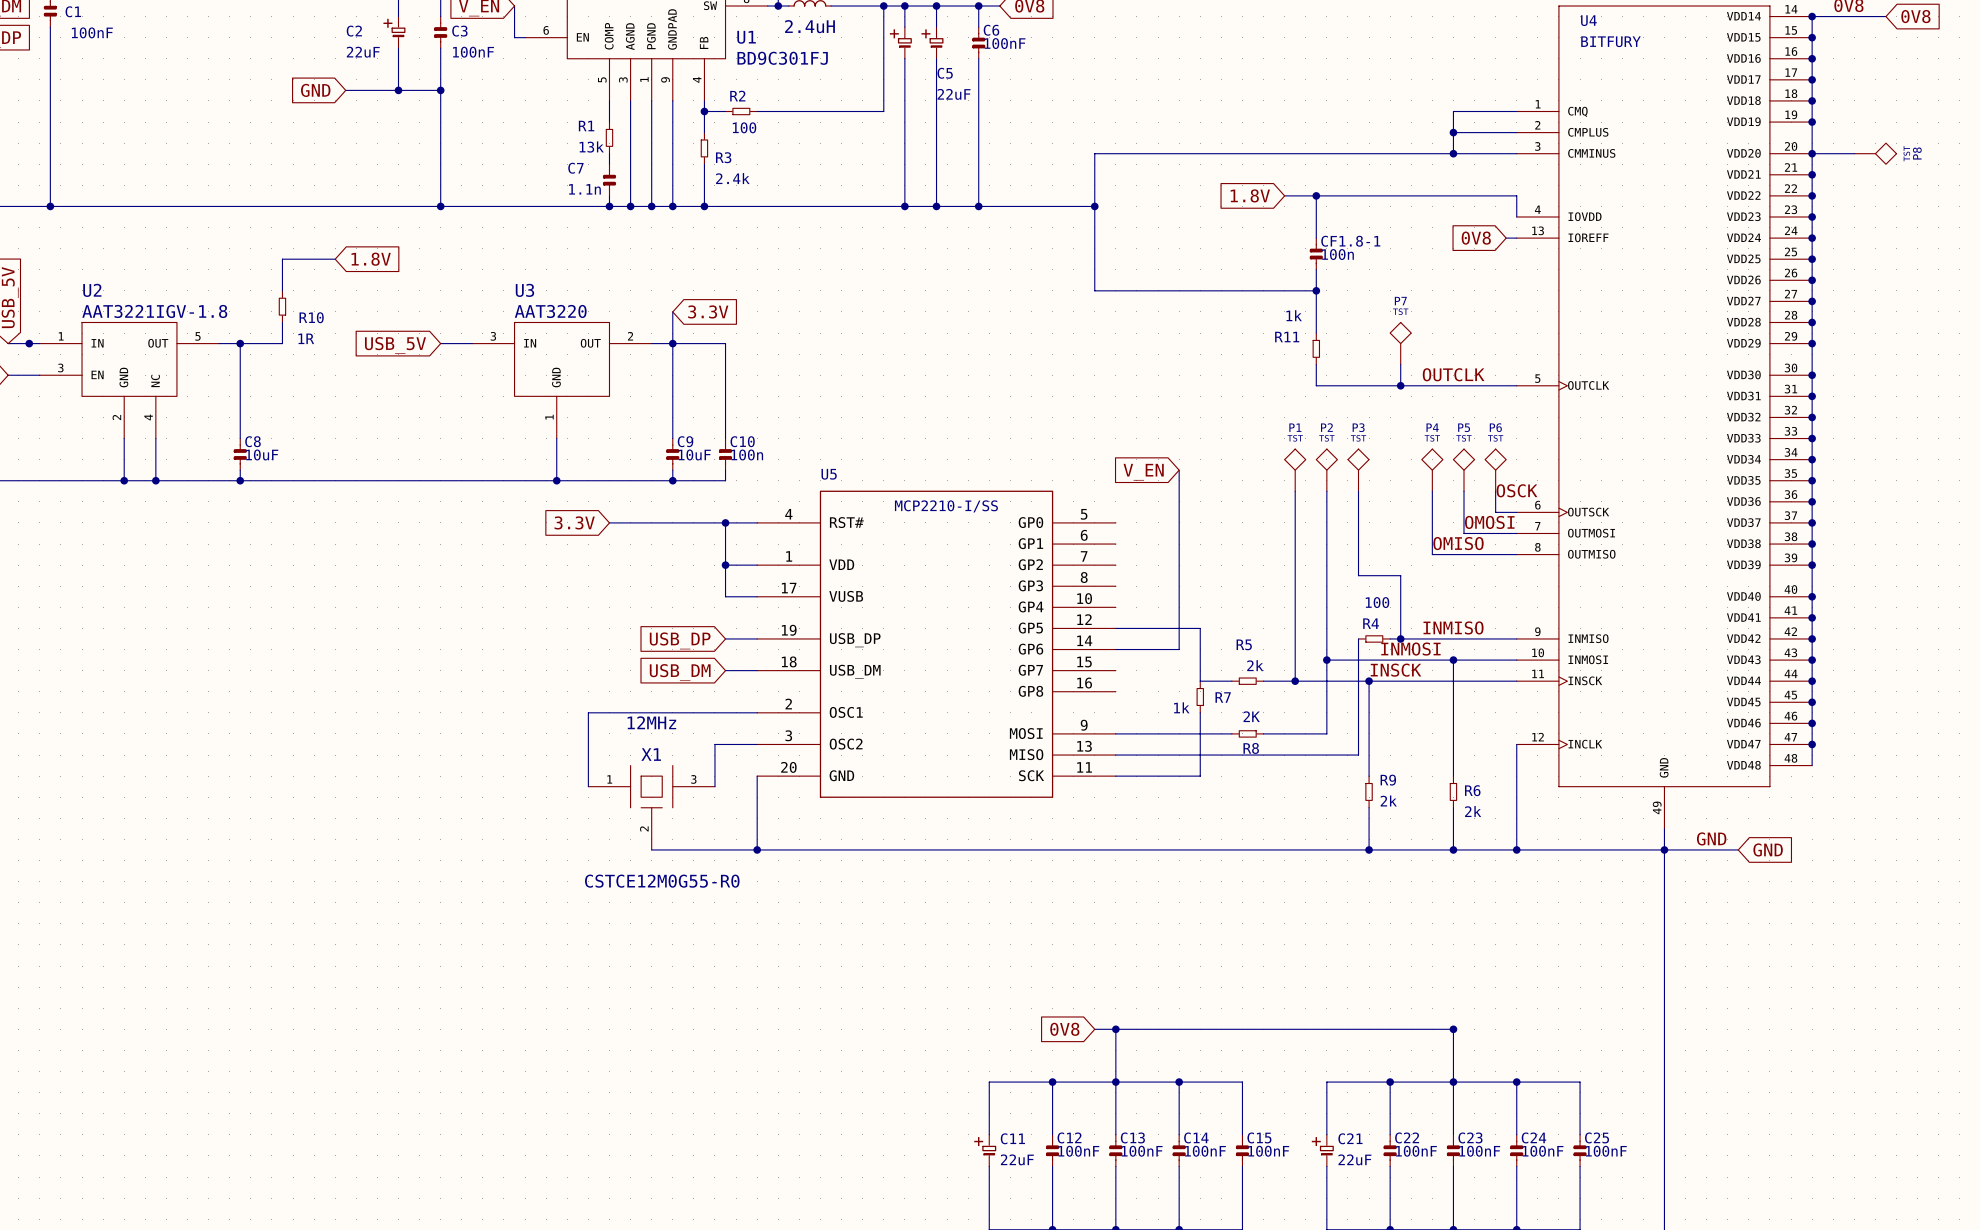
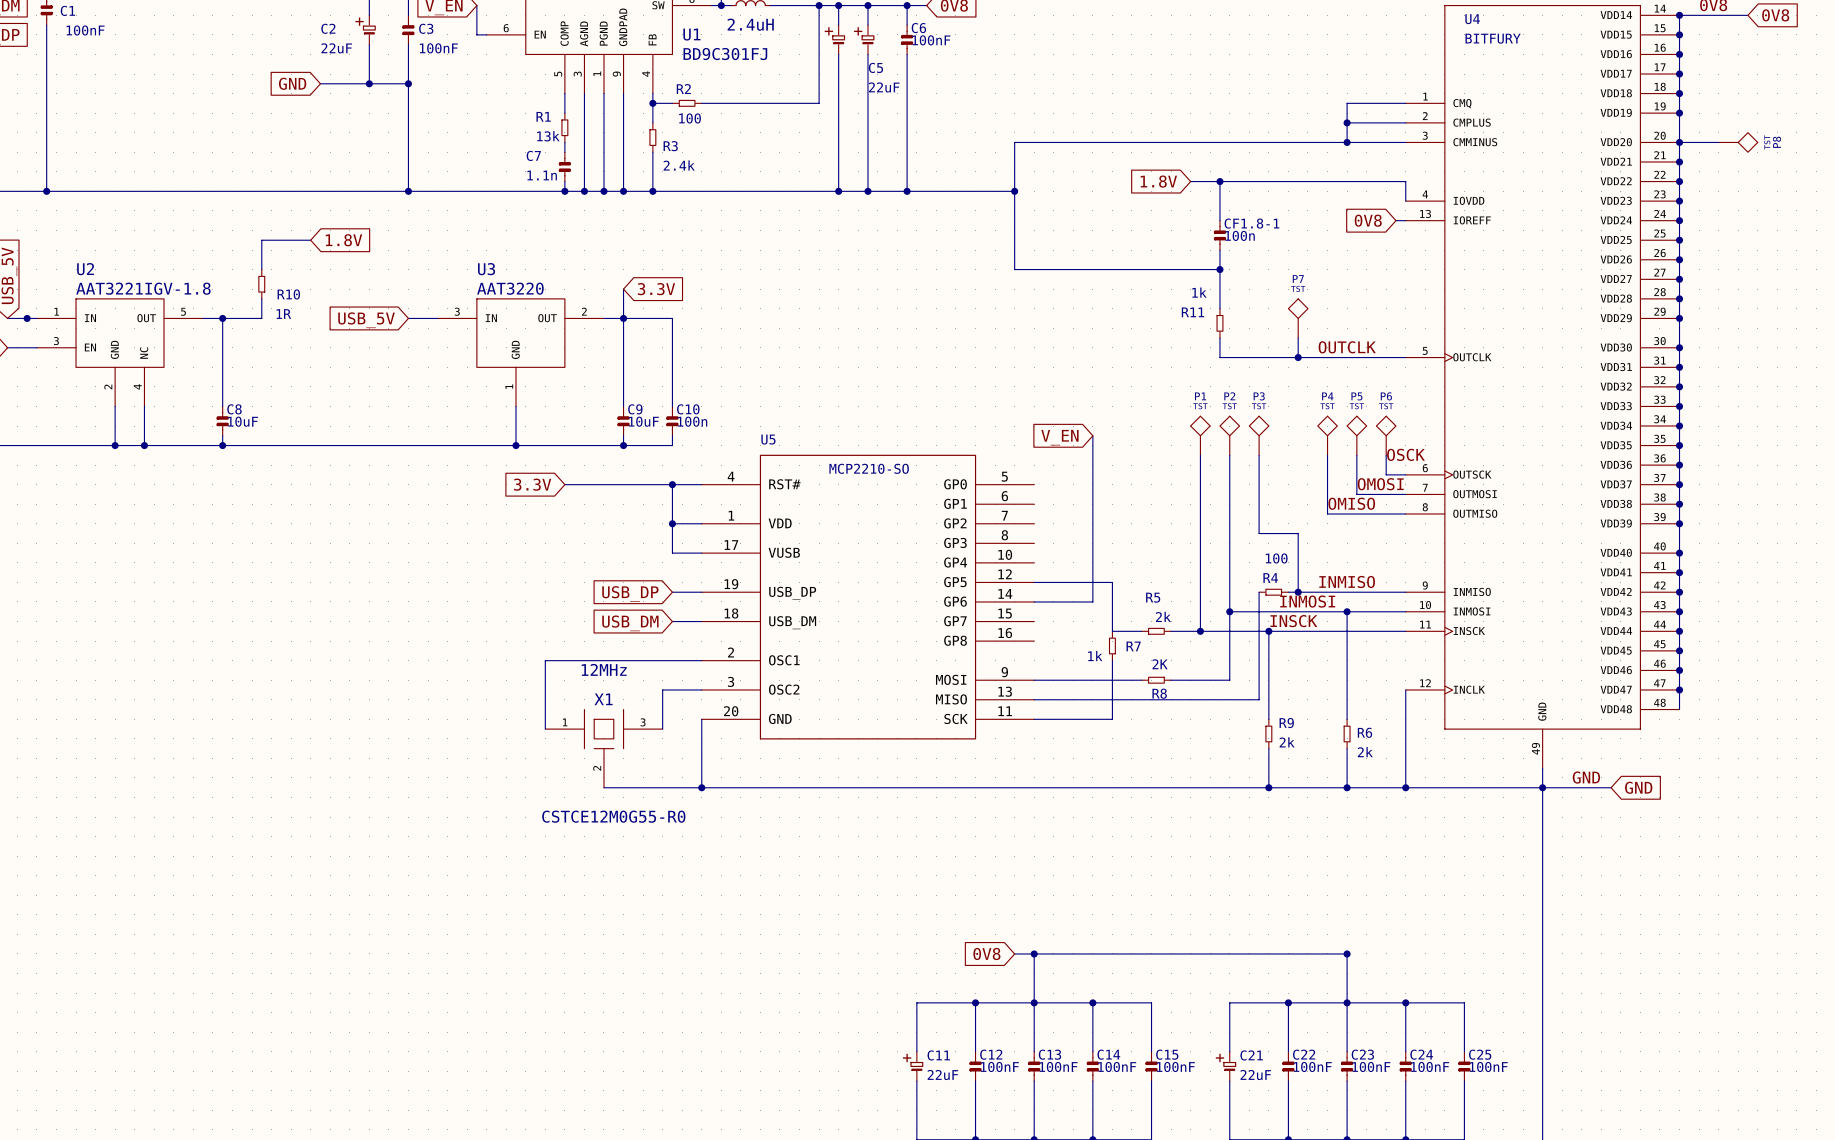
U5 value: MCP2210-I/SS (946, 506) -> MCP2210-SO (869, 468)

